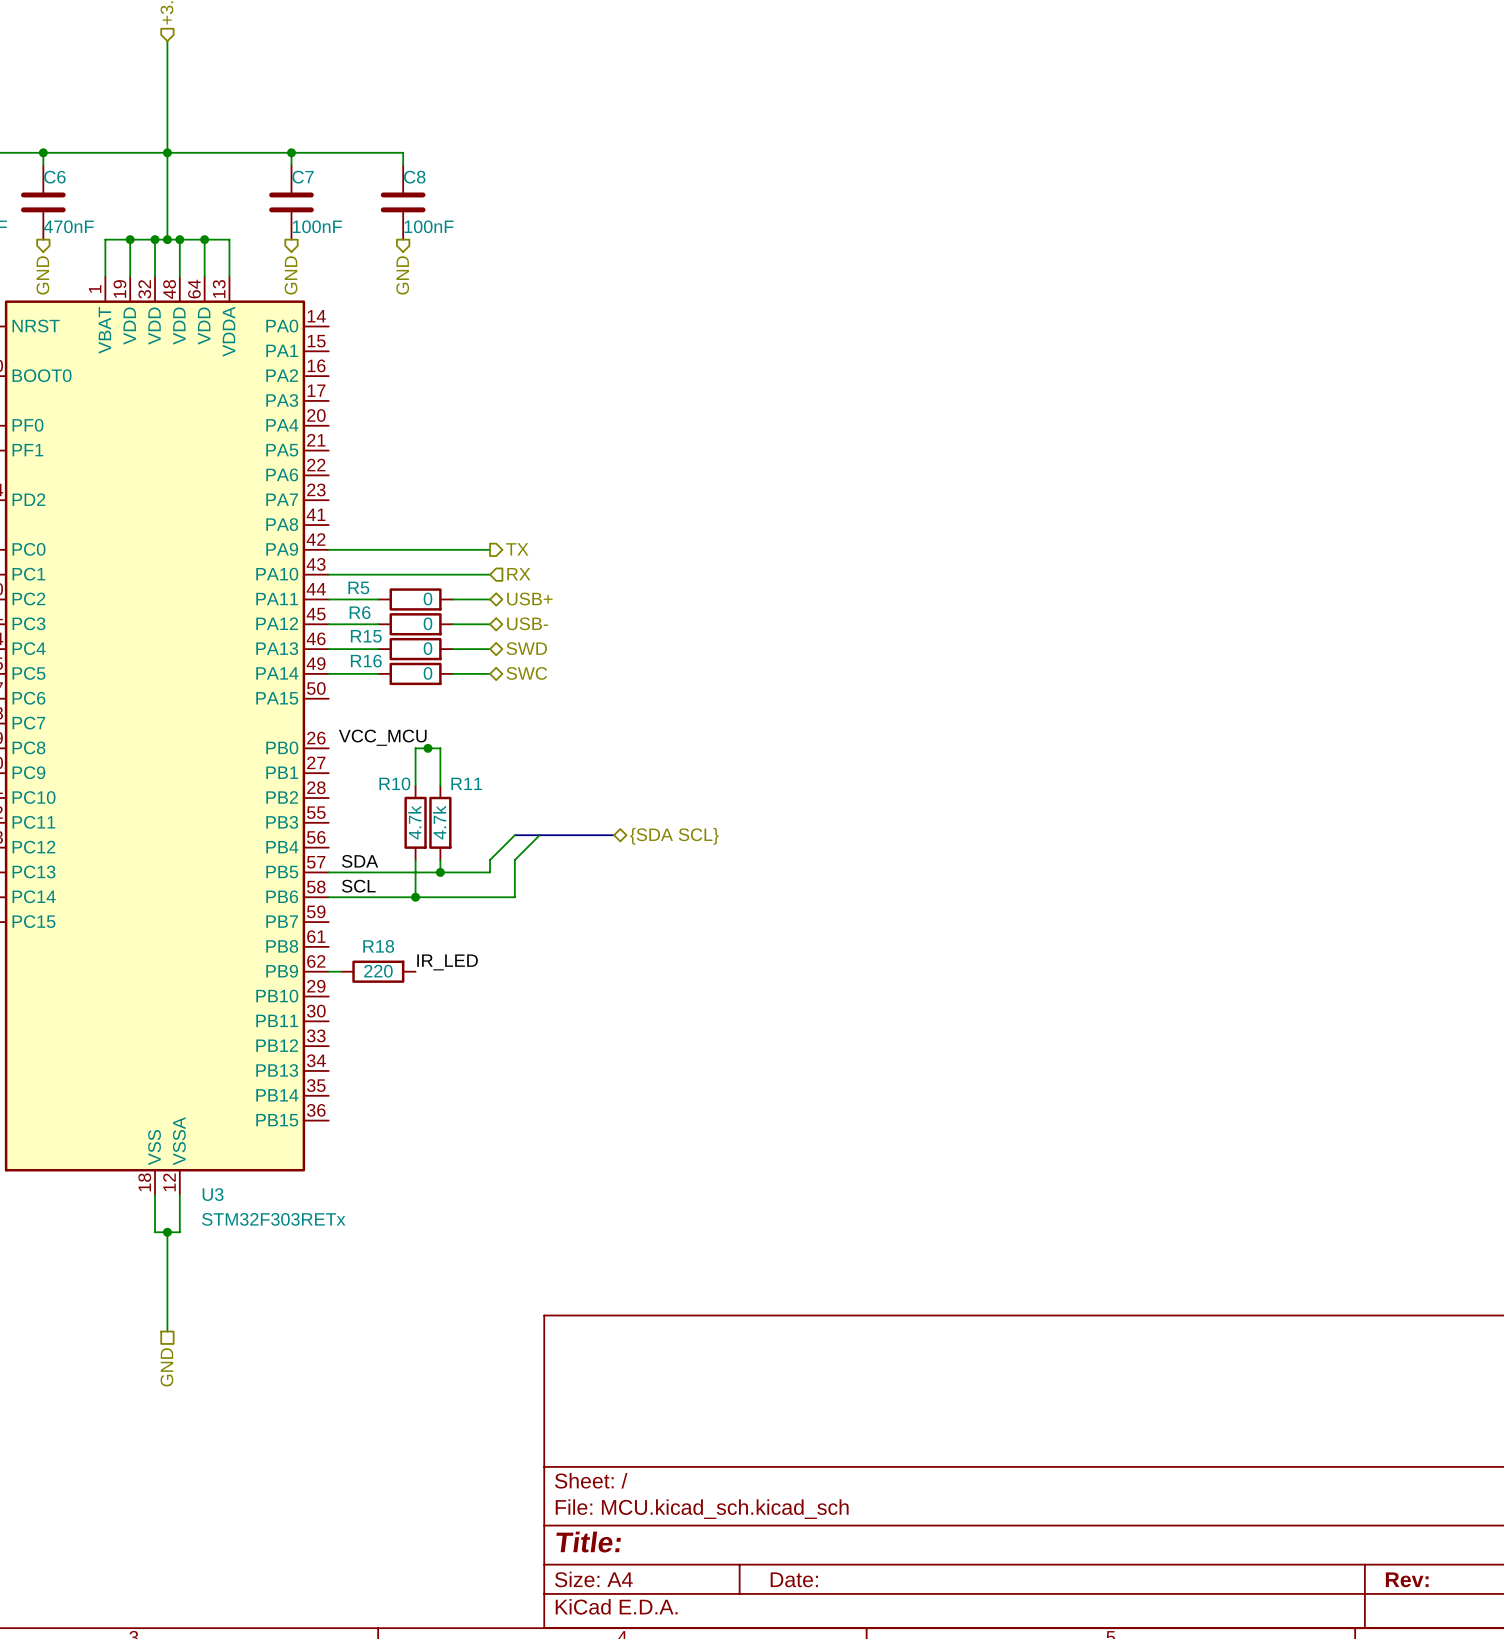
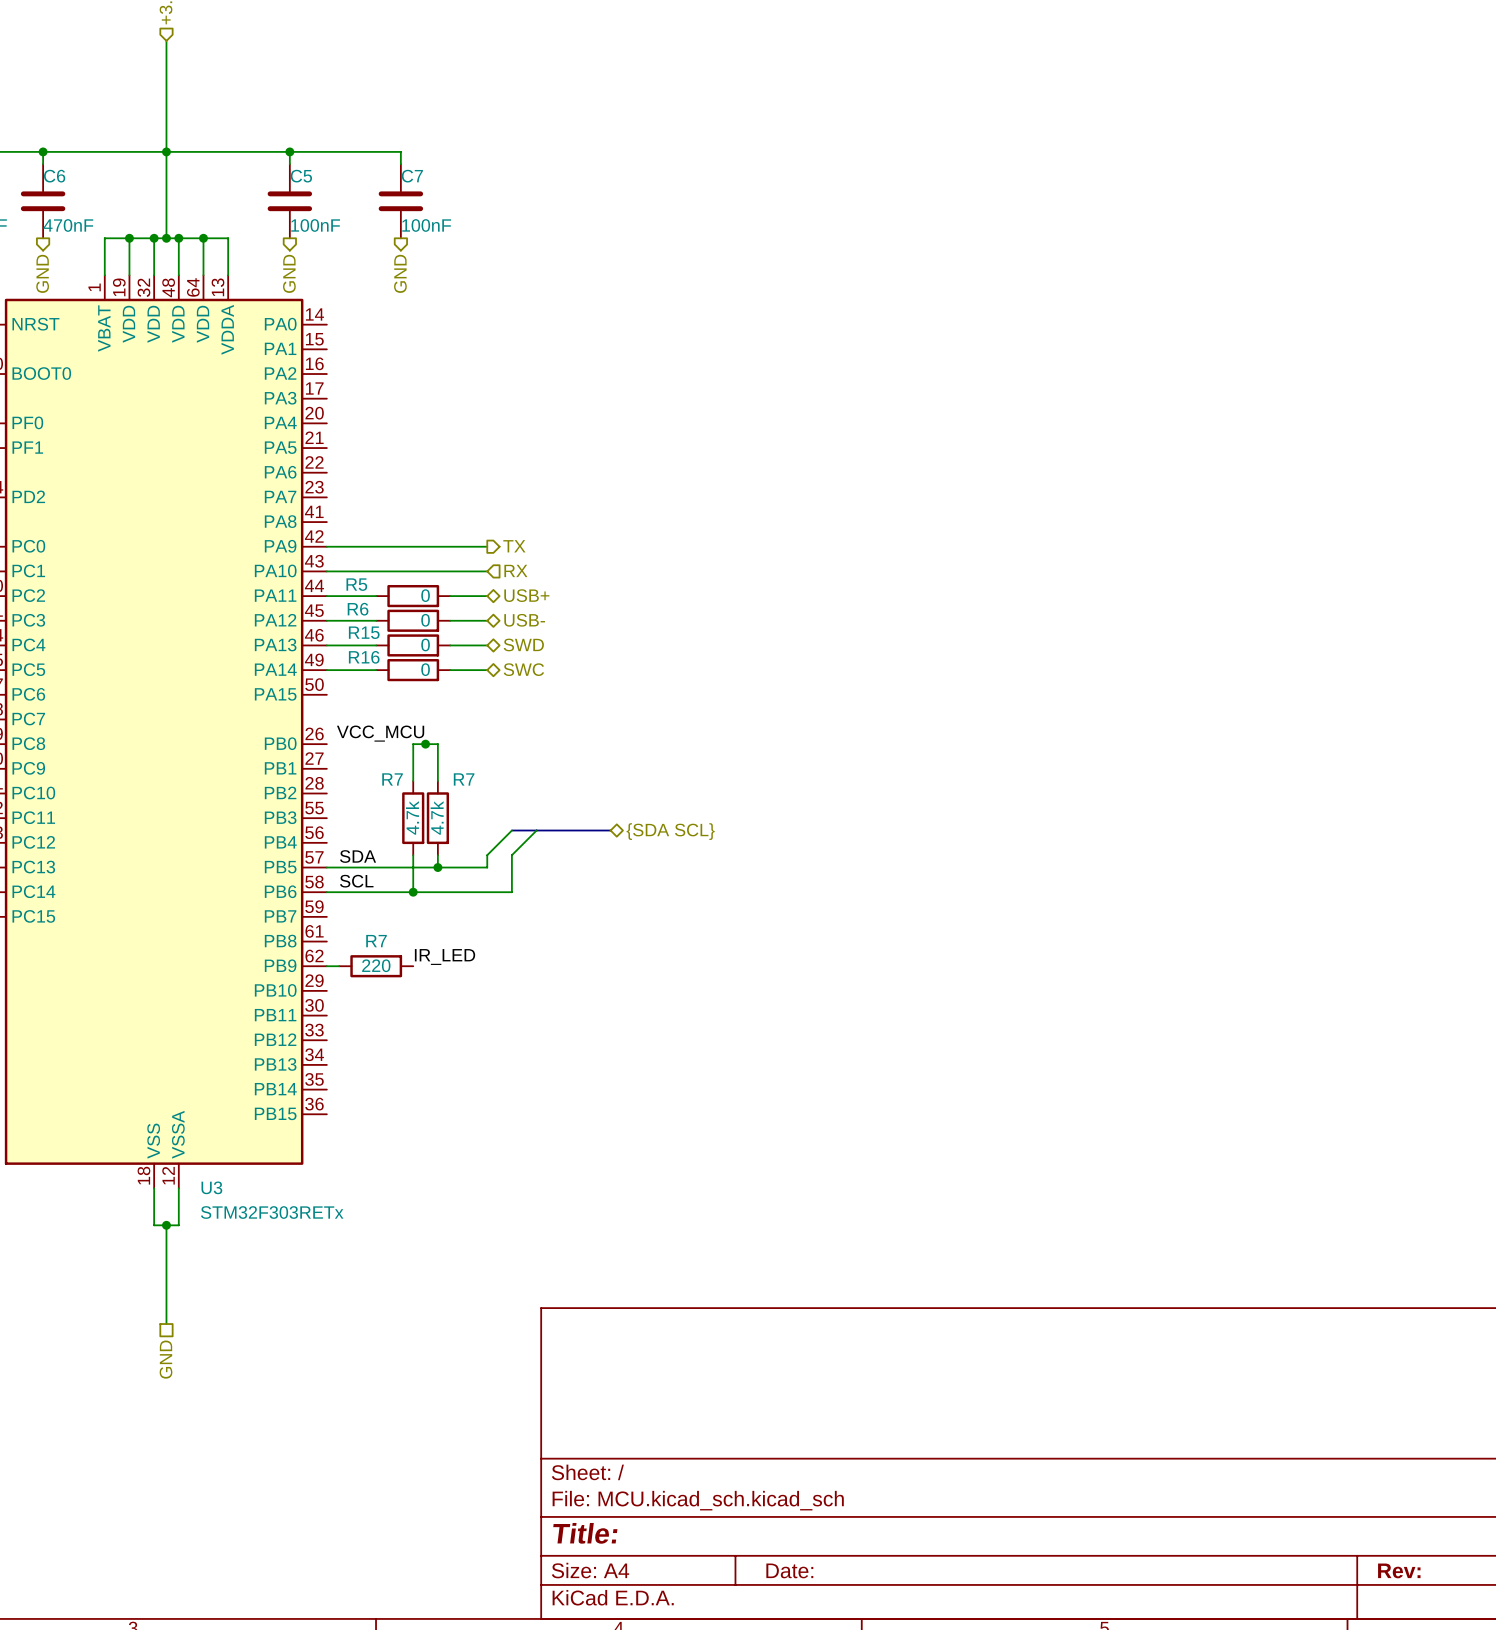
C7 name: C7 (303, 177) -> C5 (301, 176)
C8 name: C8 (414, 177) -> C7 (412, 176)
R10 name: R10 (394, 783) -> R7 (392, 779)
R11 name: R11 (466, 783) -> R7 (464, 779)
R18 name: R18 (378, 946) -> R7 (376, 941)

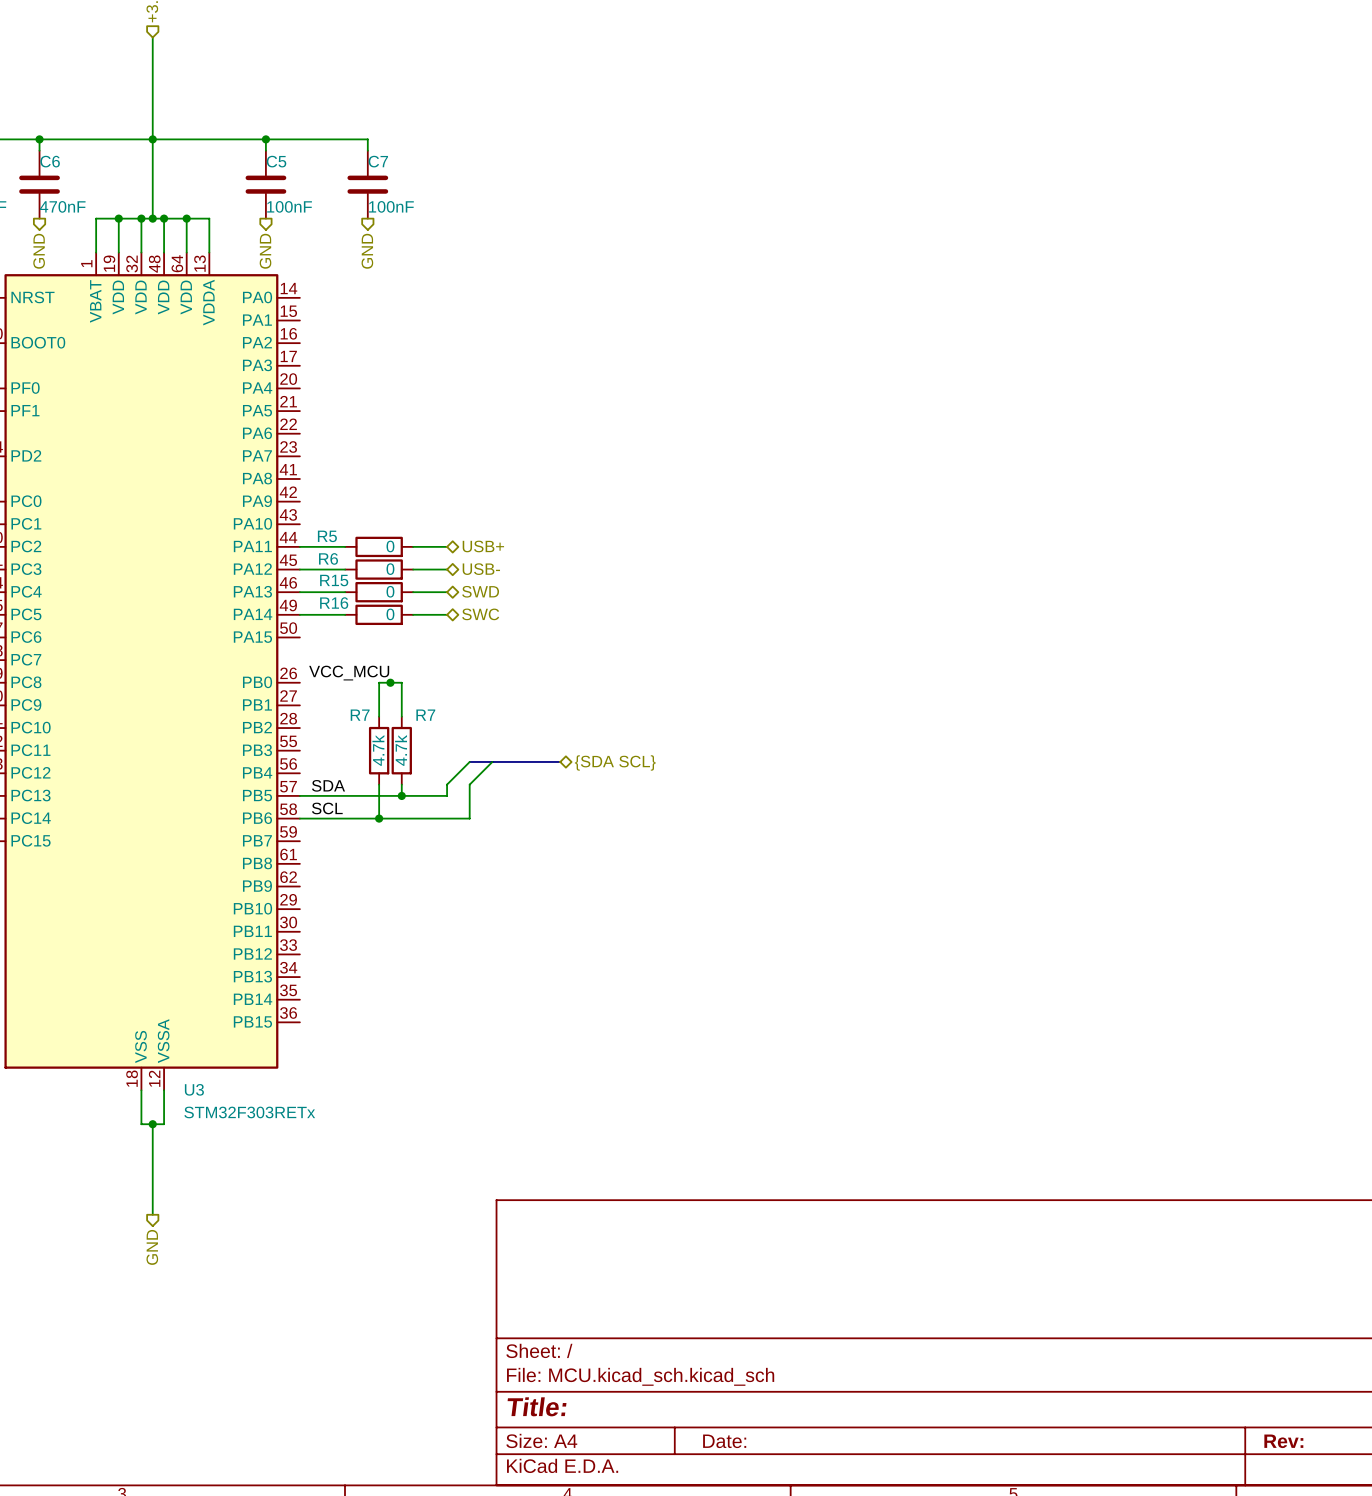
wire: (326, 546) (487, 546) -> none
hierarchical label: TX (514, 546) -> none
hierarchical label: RX (515, 570) -> none
wire: (326, 571) (487, 571) -> none
label: IR_LED (445, 957) -> none
wire: (326, 966) (339, 966) -> none
R7: 220 (376, 966) -> none
hierarchical label shape: passive (166, 1359) -> output (152, 1247)

